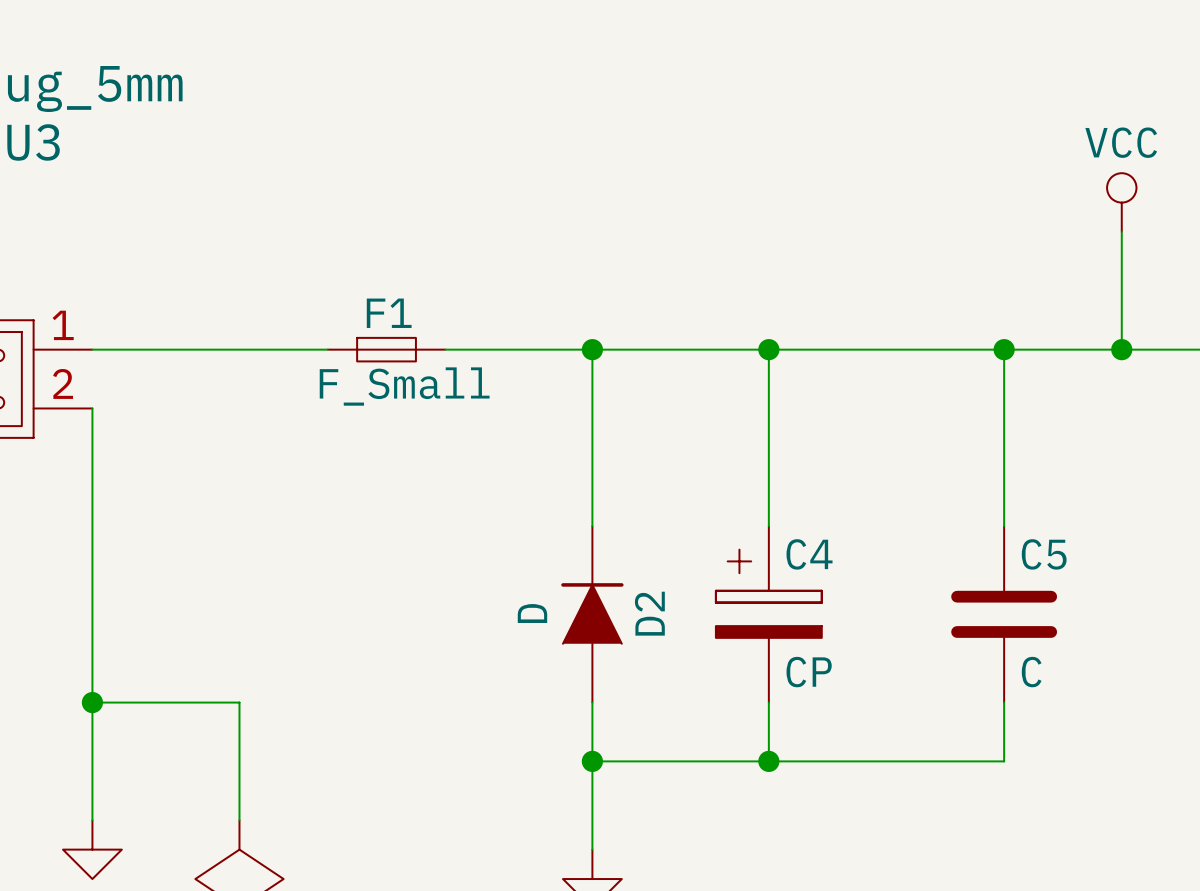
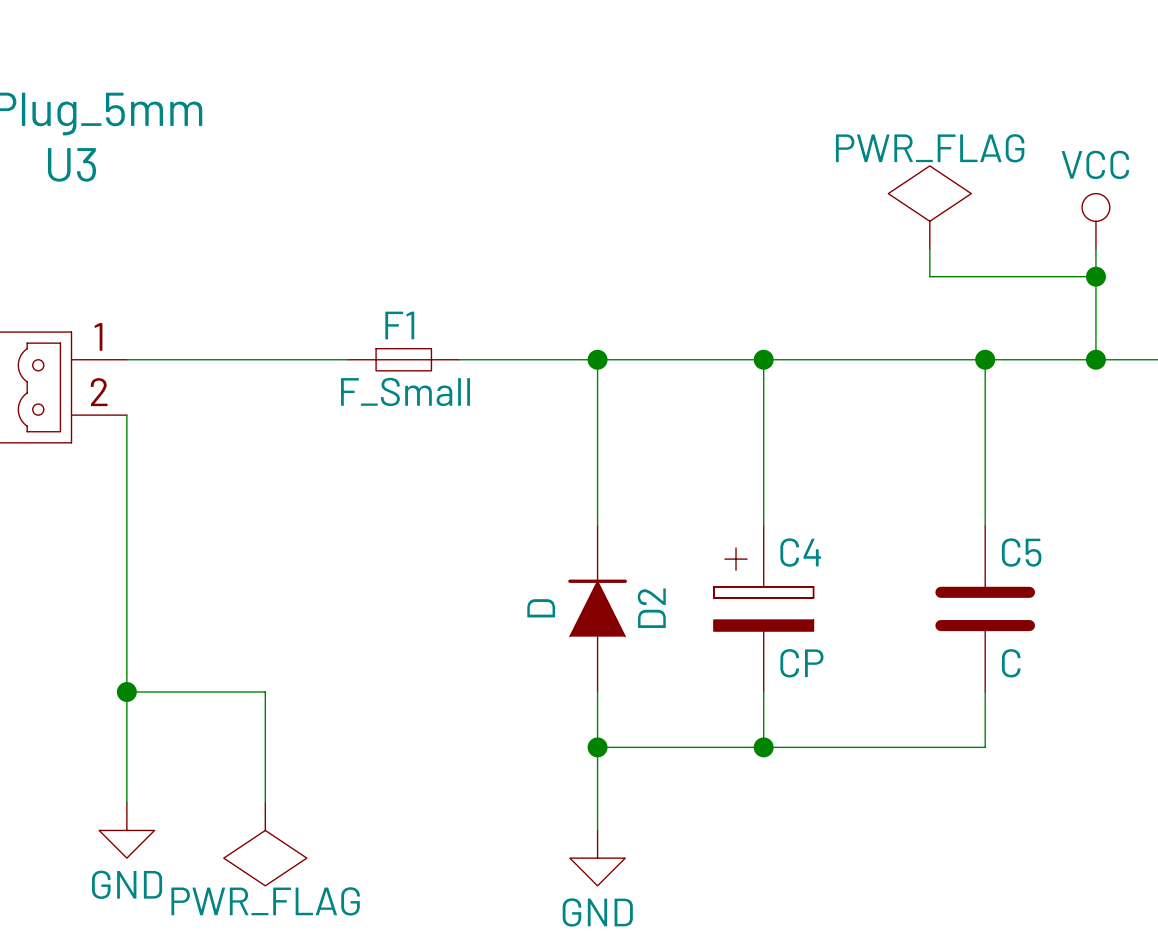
power symbol: none -> PWR_FLAG (929, 207)
wire: none -> (929, 248) (929, 276) (1095, 276)
junction: none -> (1095, 276)

